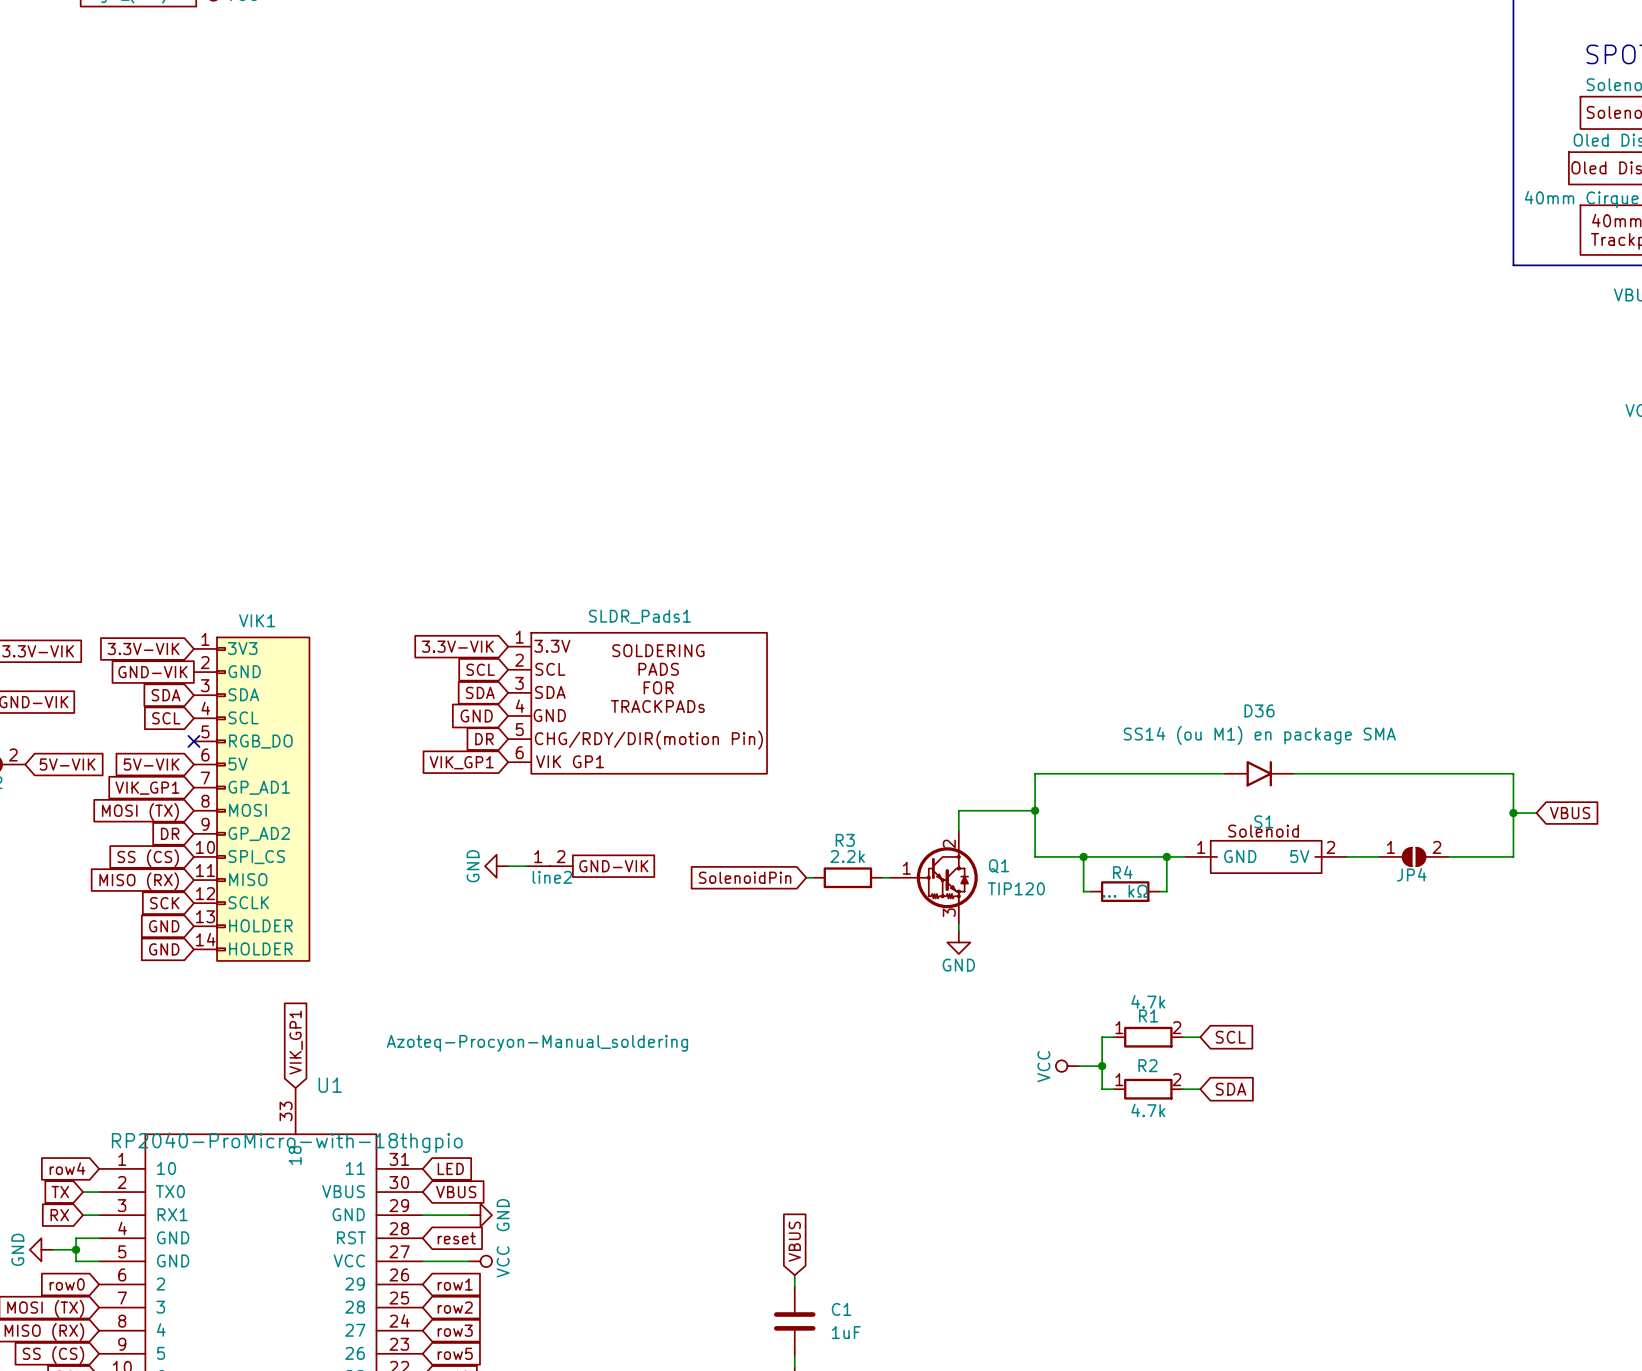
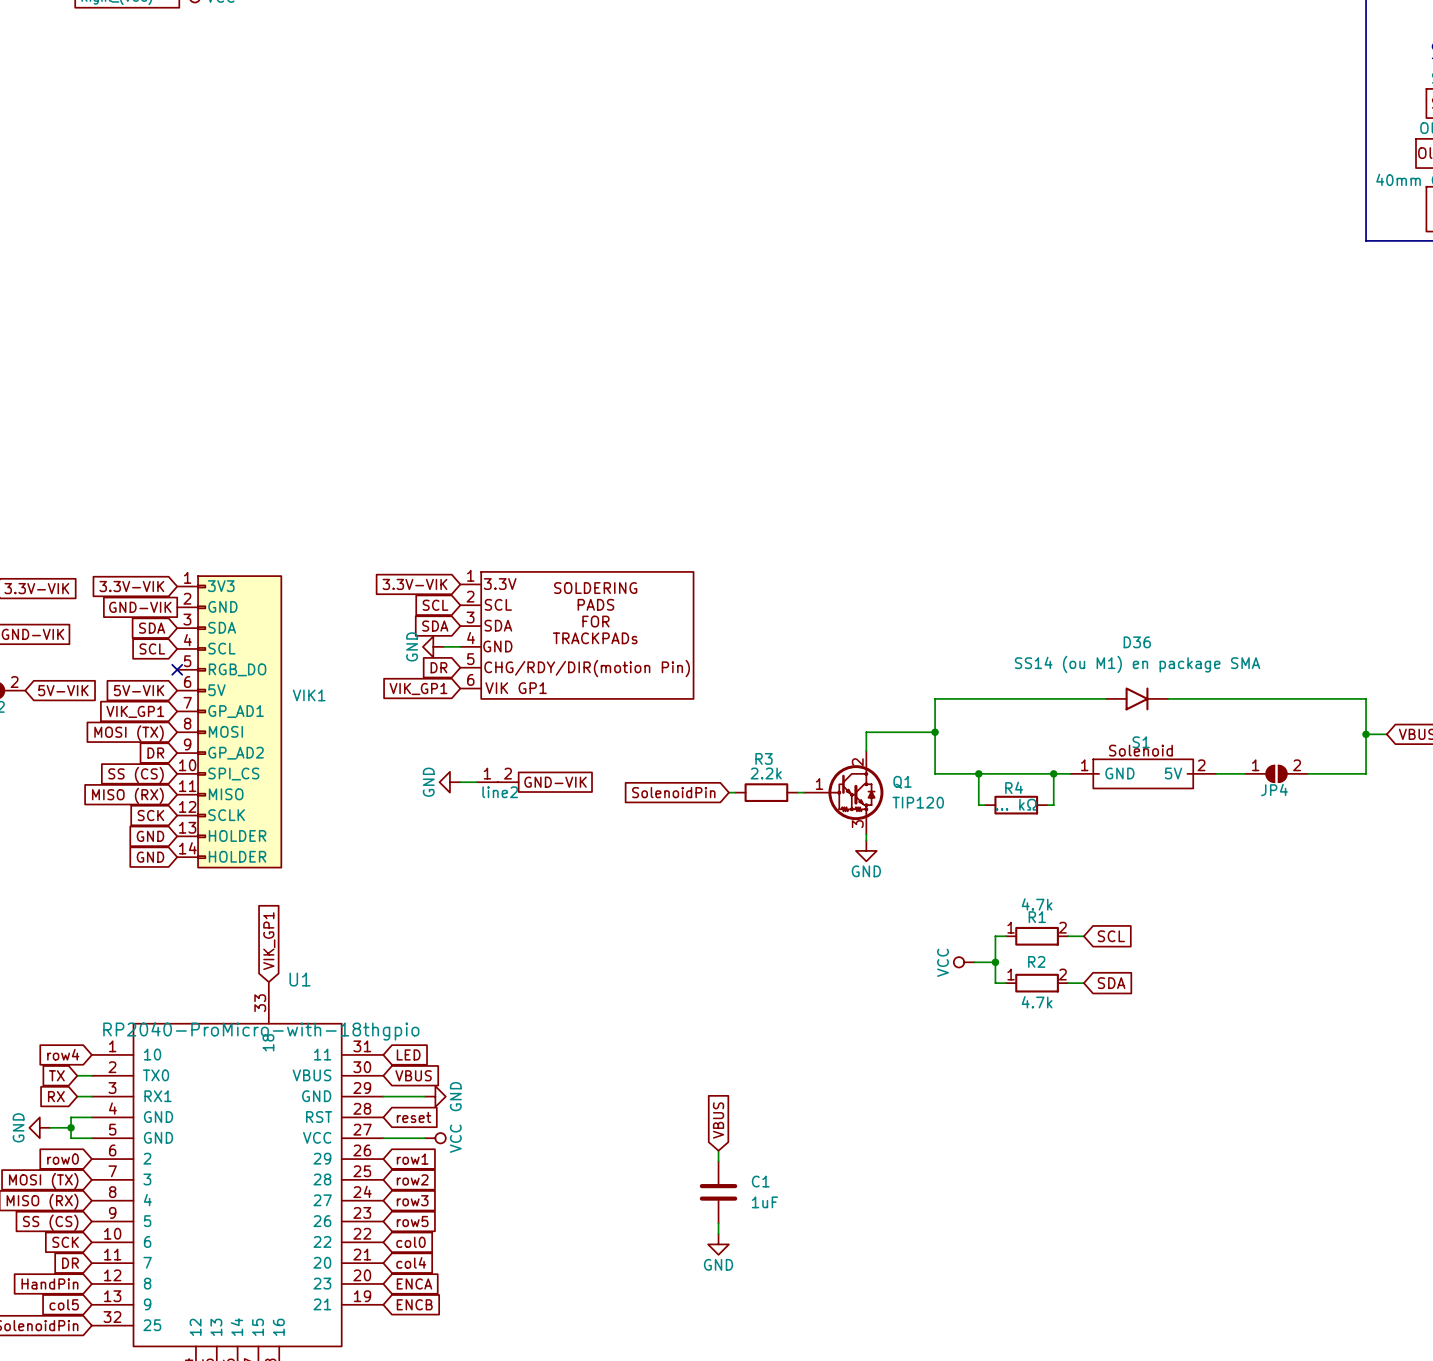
SLDR_Pads1 name: SLDR_Pads1 (639, 616) -> none
VIK1 name position: VIK1 (257, 620) -> VIK1 (309, 695)
global label: GND (476, 715) -> none
power symbol: none -> GND (433, 646)
wire: none -> (443, 646) (460, 646)
SLDR_Pads1 value: Azoteq-Procyon-Manual_soldering (537, 1043) -> none

